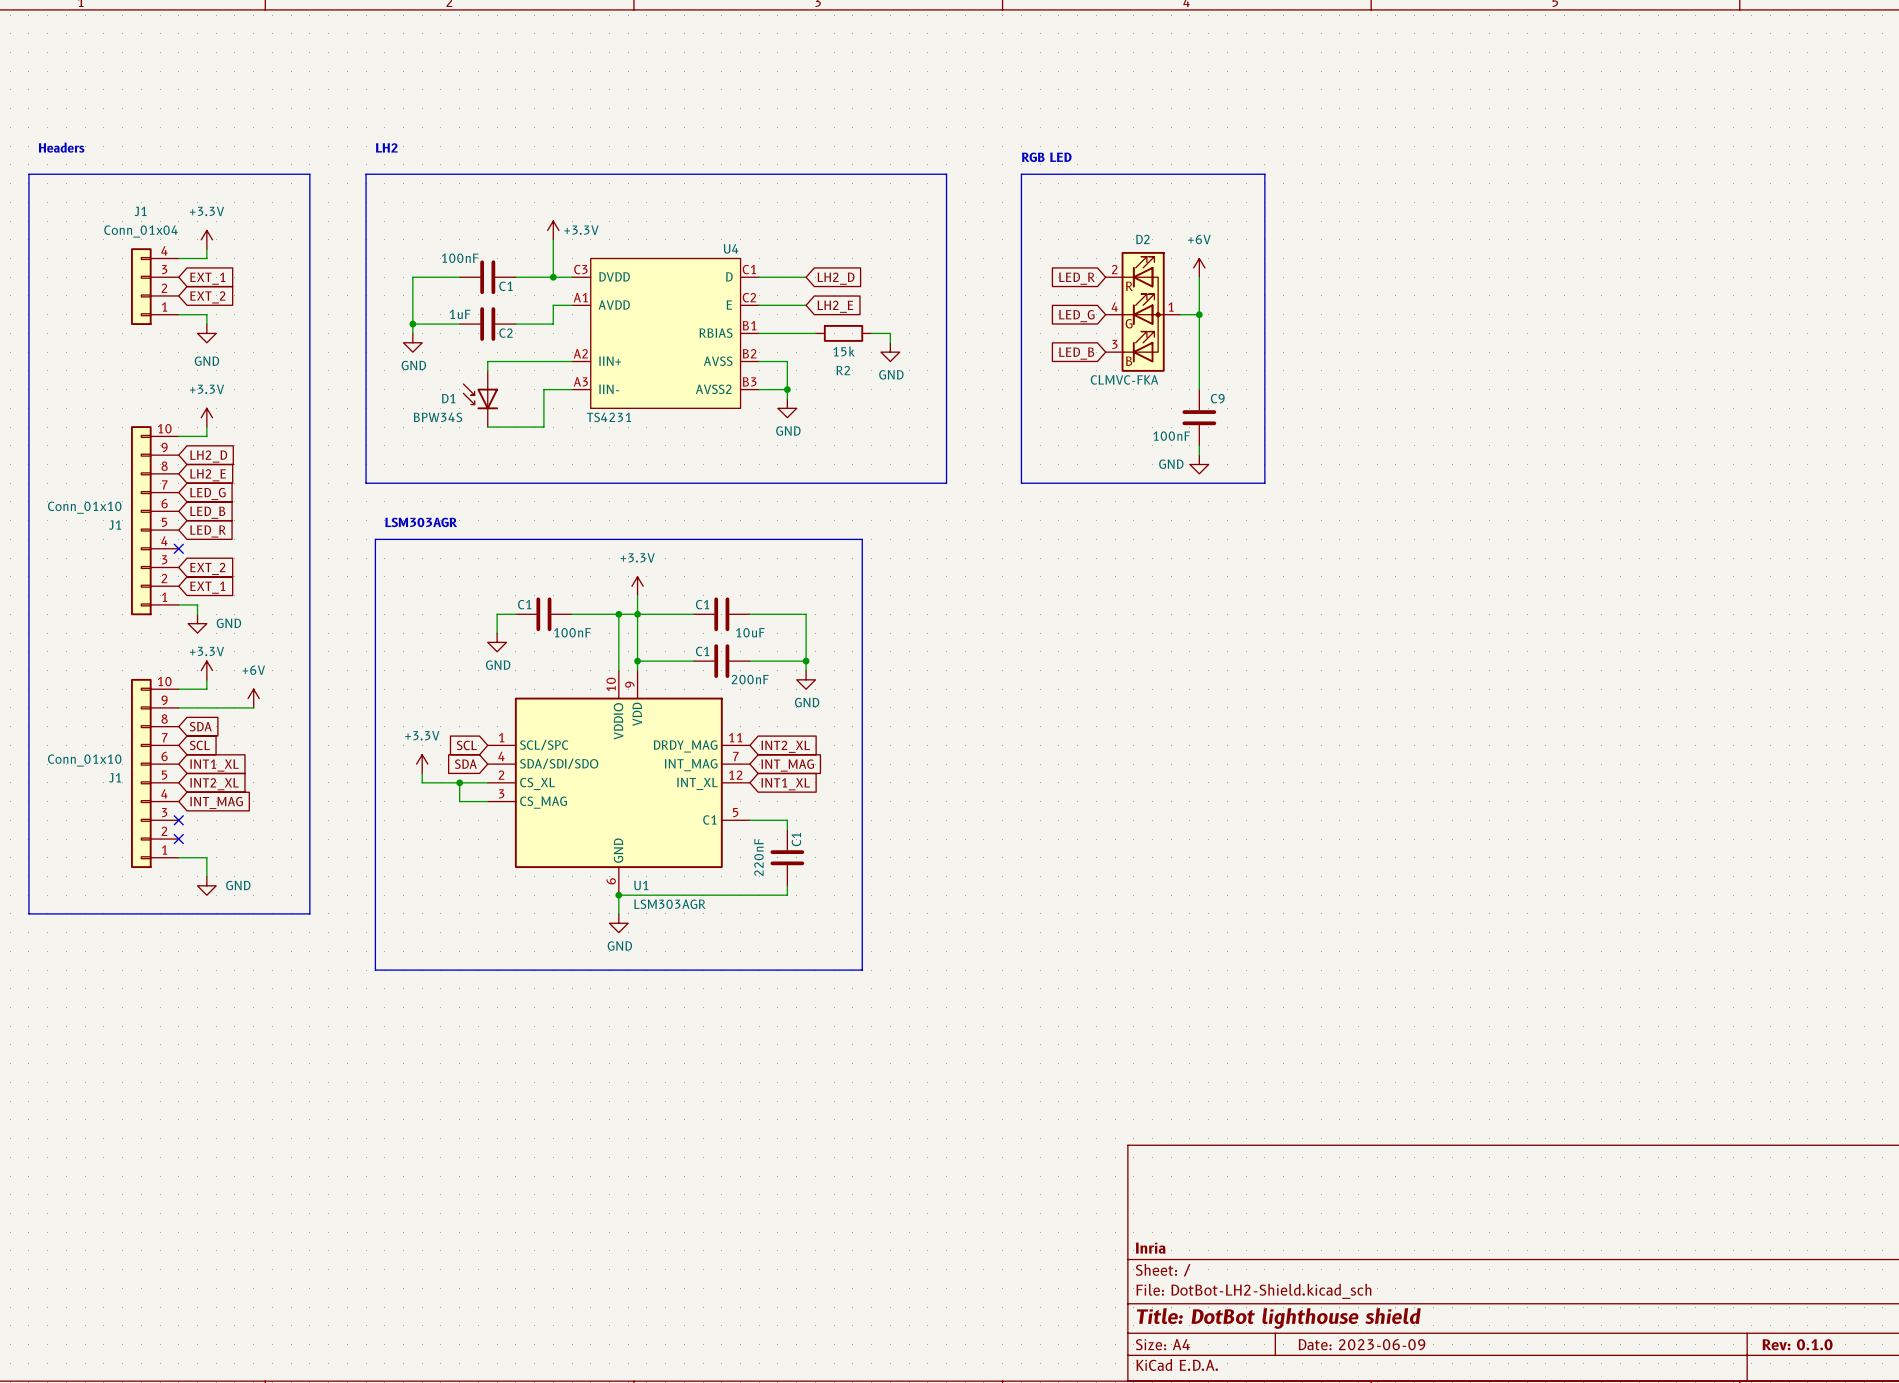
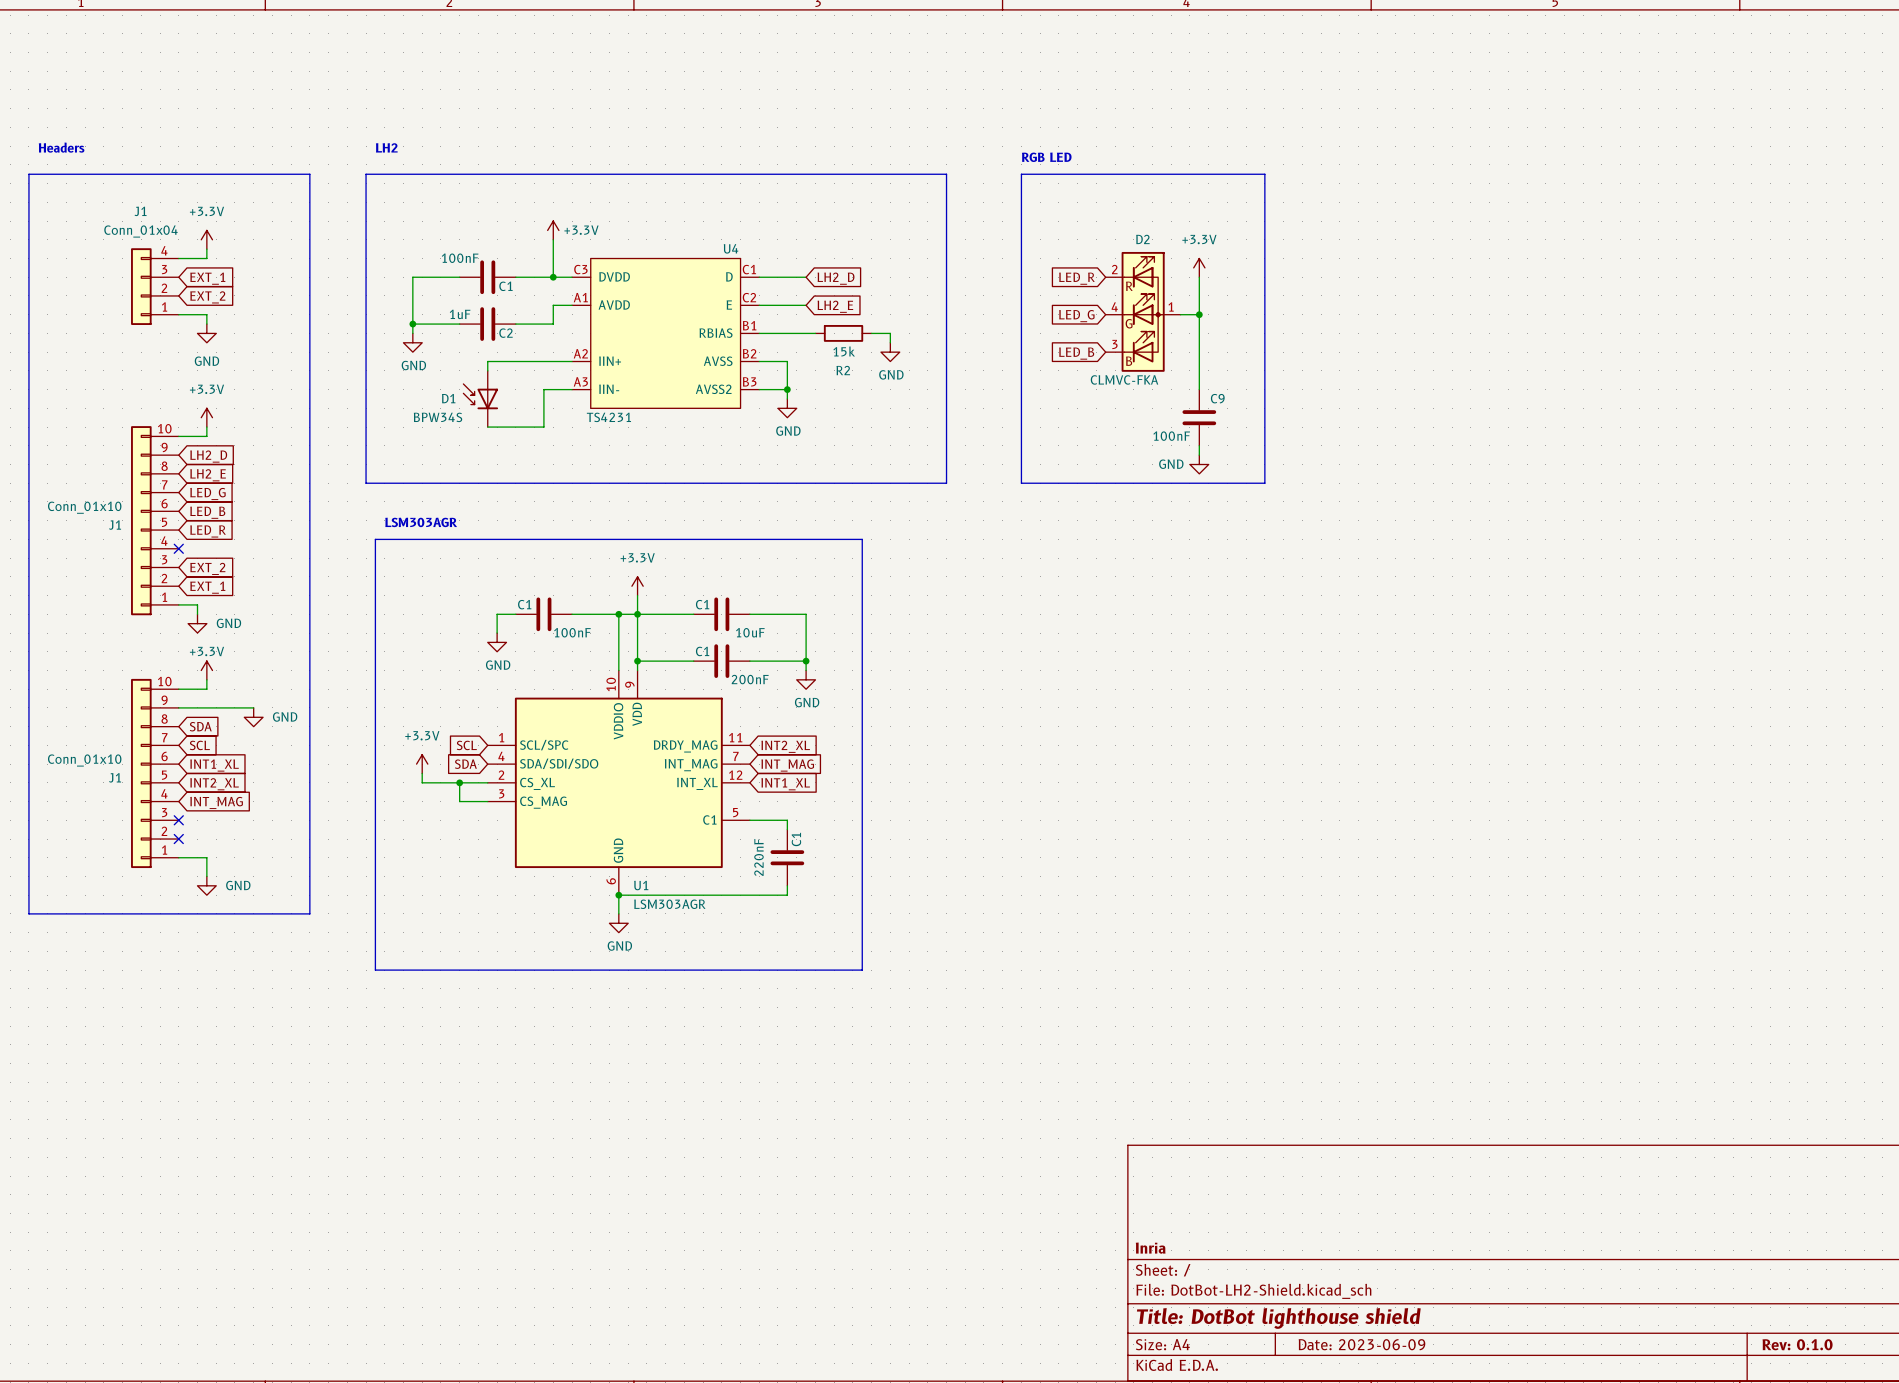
power symbol: +6V (1199, 267) -> +3.3V (1199, 267)
power symbol: +6V (253, 698) -> none
power symbol: none -> GND (253, 717)

